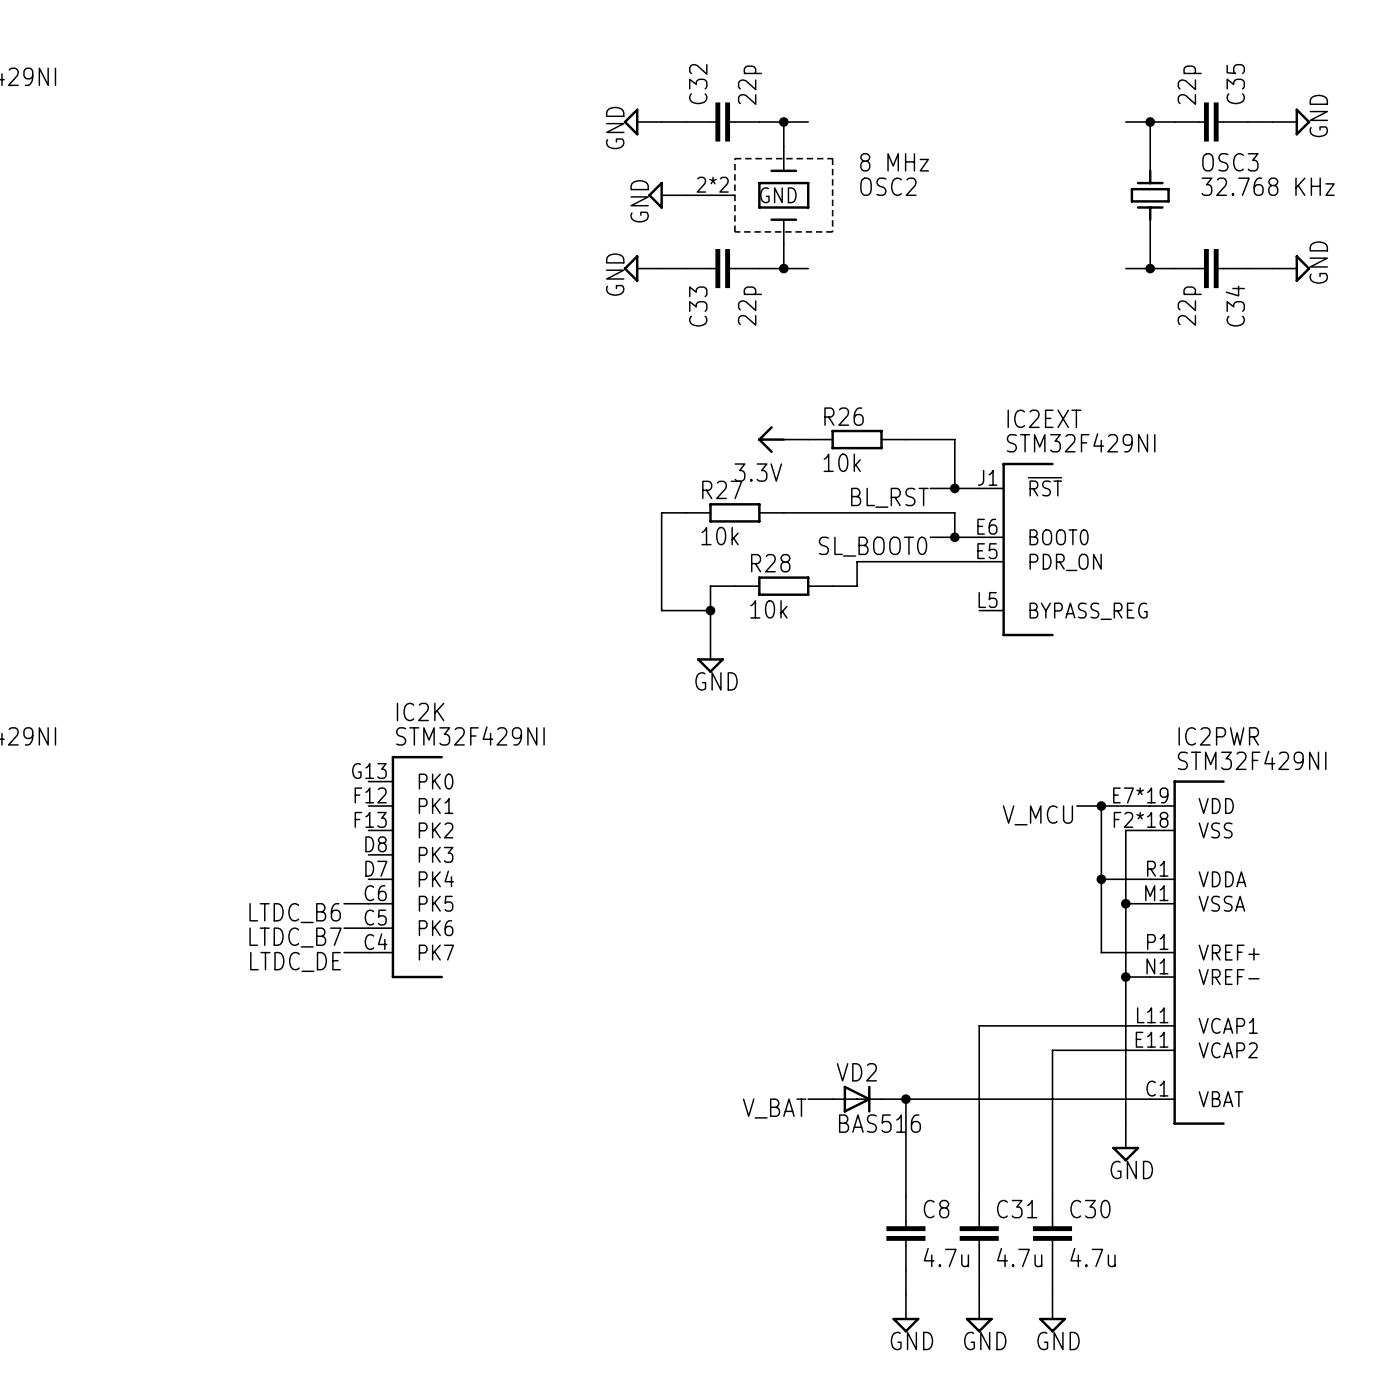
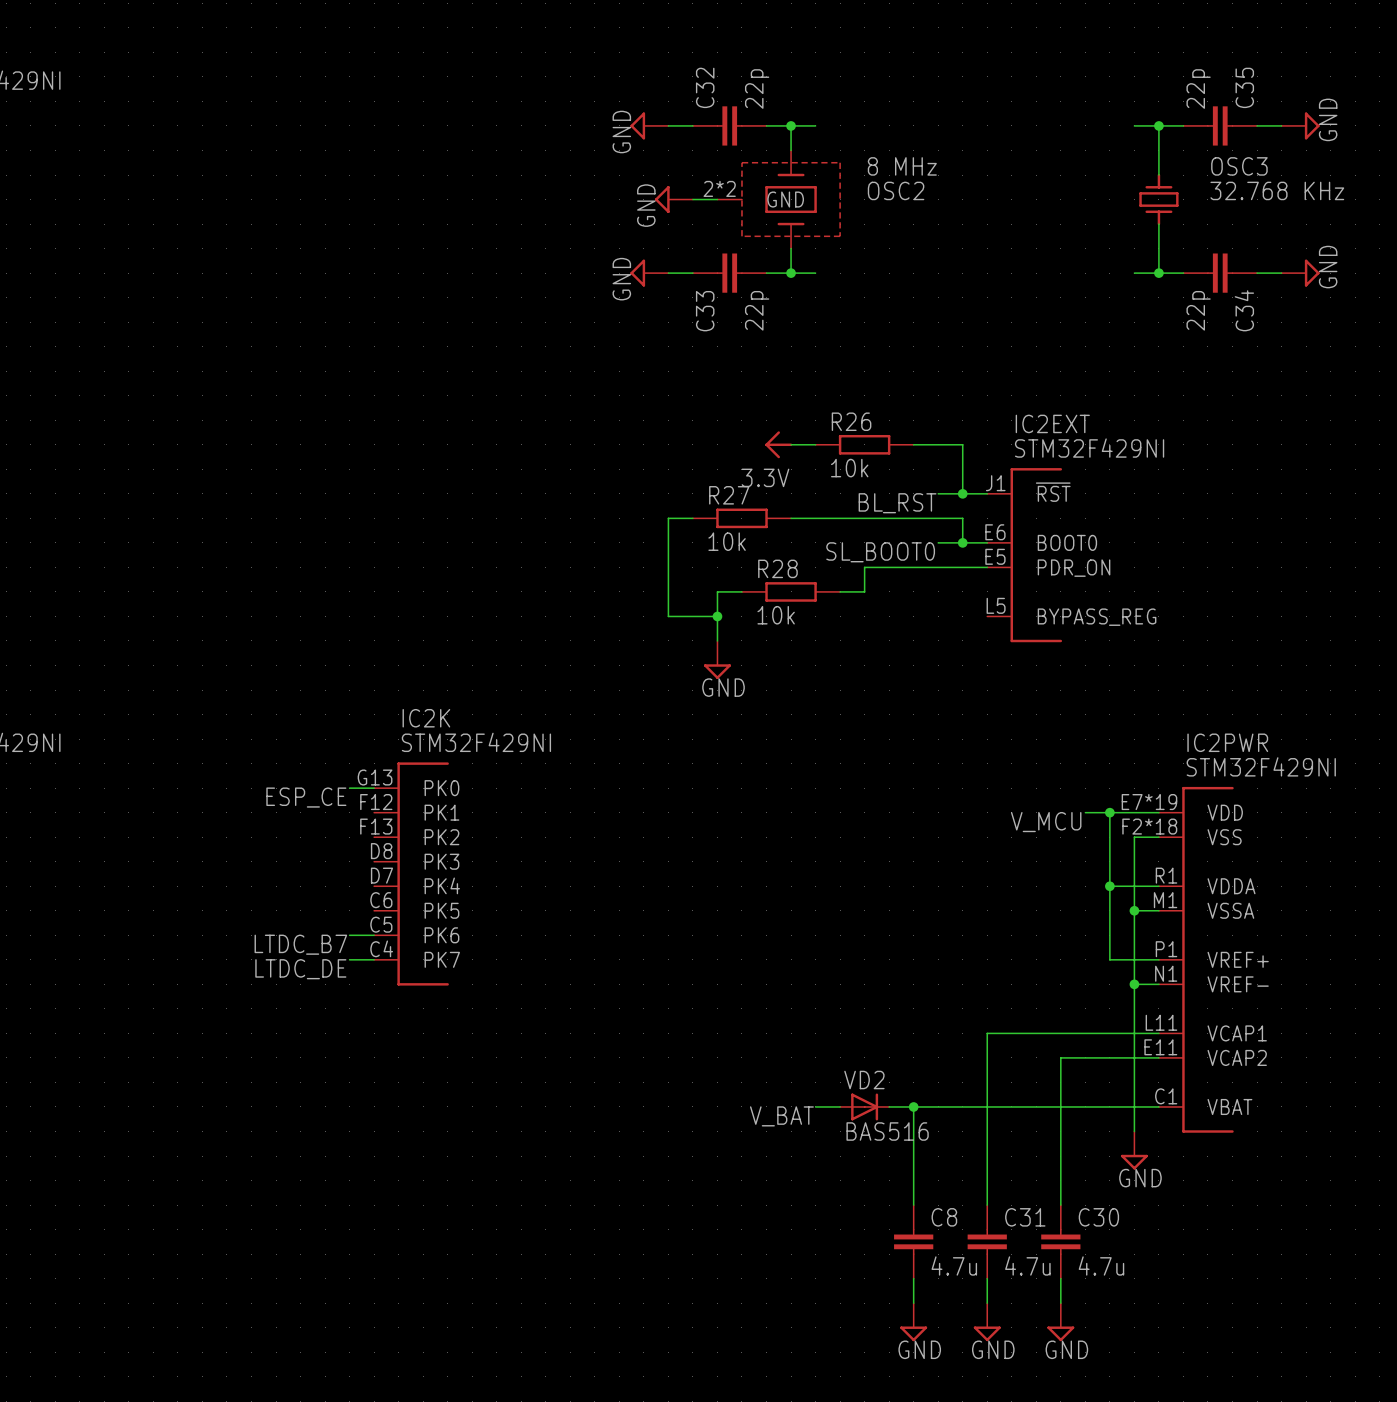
label: none -> ESP_CE (306, 797)
wire: (344, 903) (368, 903) -> (349, 788) (374, 788)
label: LTDC_B6 (295, 913) -> none

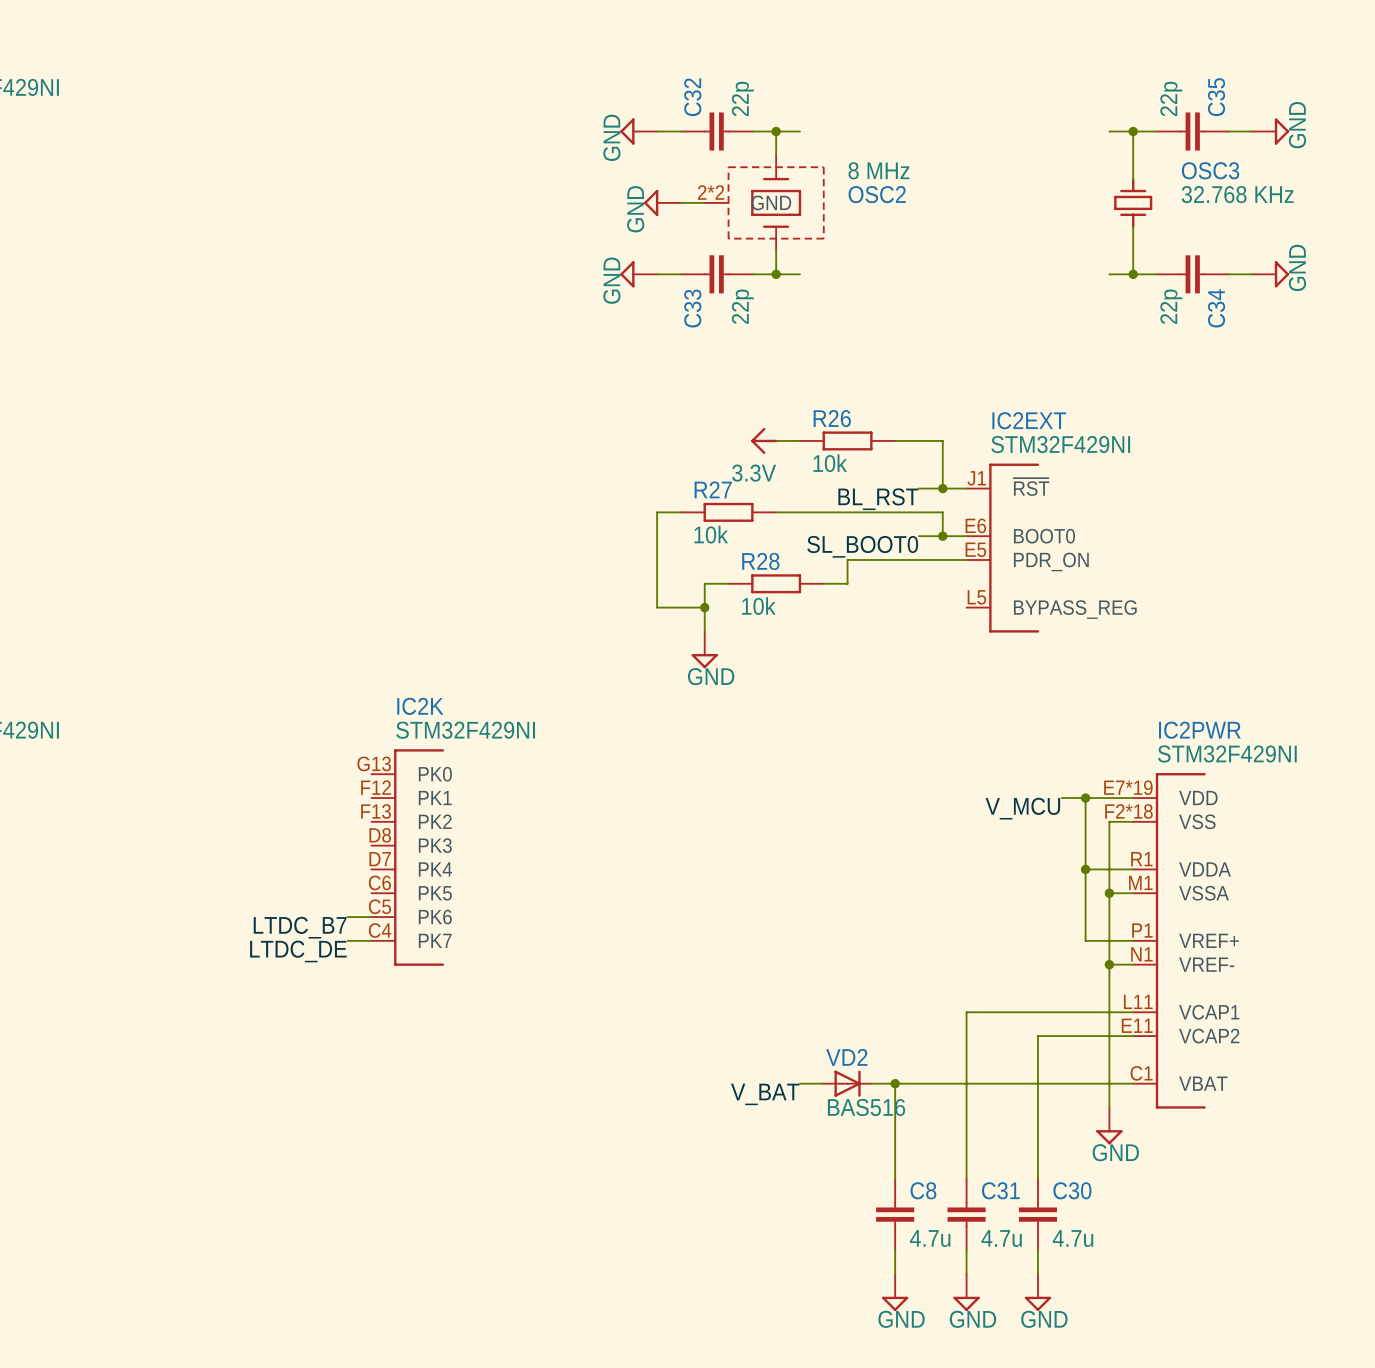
wire: (349, 788) (374, 788) -> none
label: ESP_CE (306, 797) -> none

